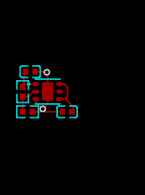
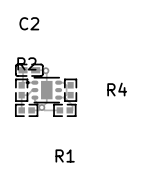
R2 name: none -> R2 (26, 63)
part: (30, 71) -> none
C2: none -> (29, 70)
R4: none -> (70, 90)
R1: none -> (64, 110)
part: (67, 111) -> none

